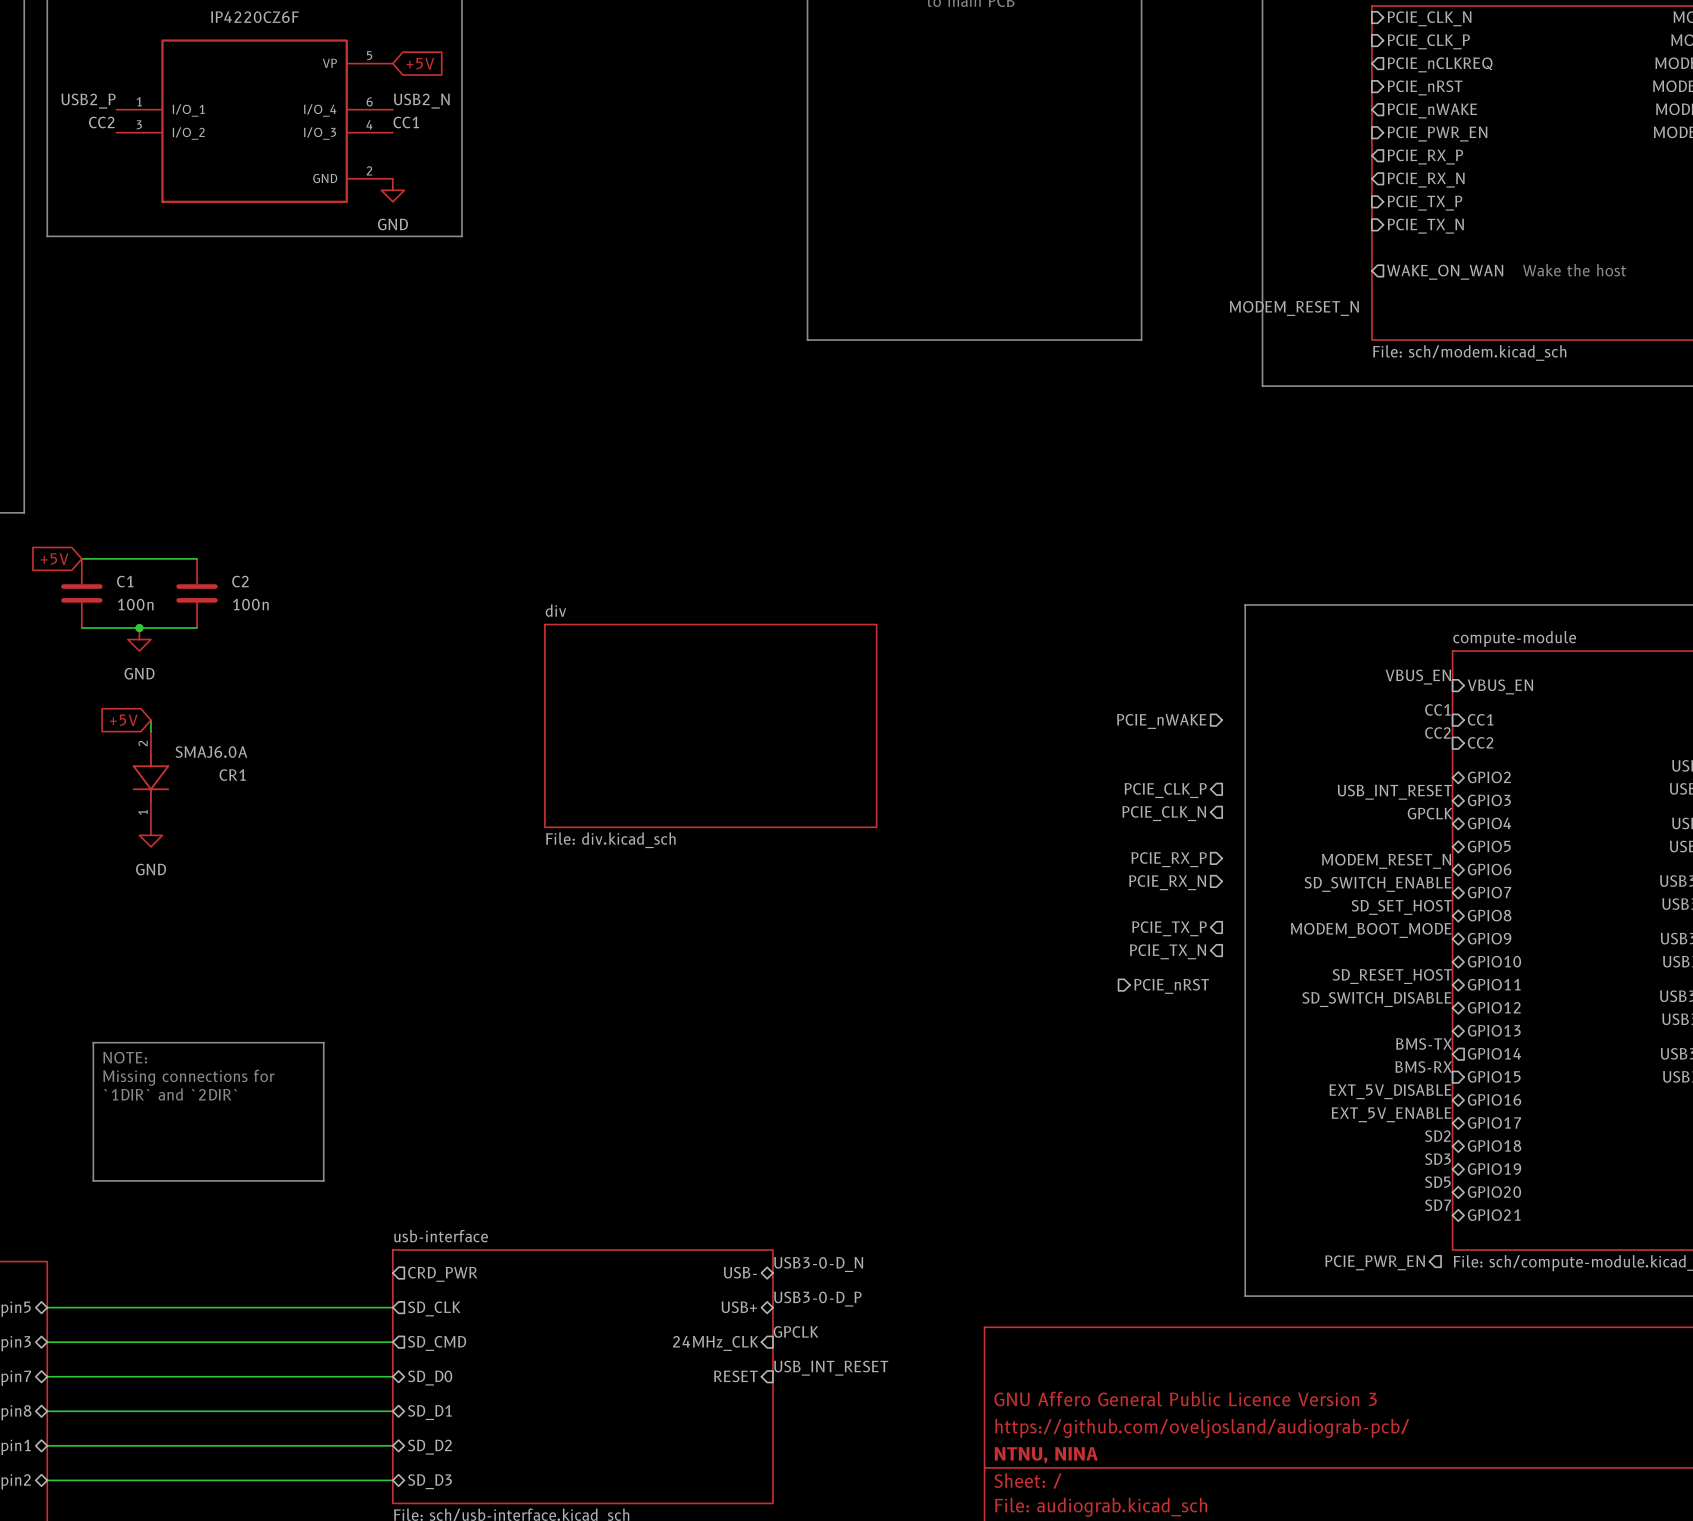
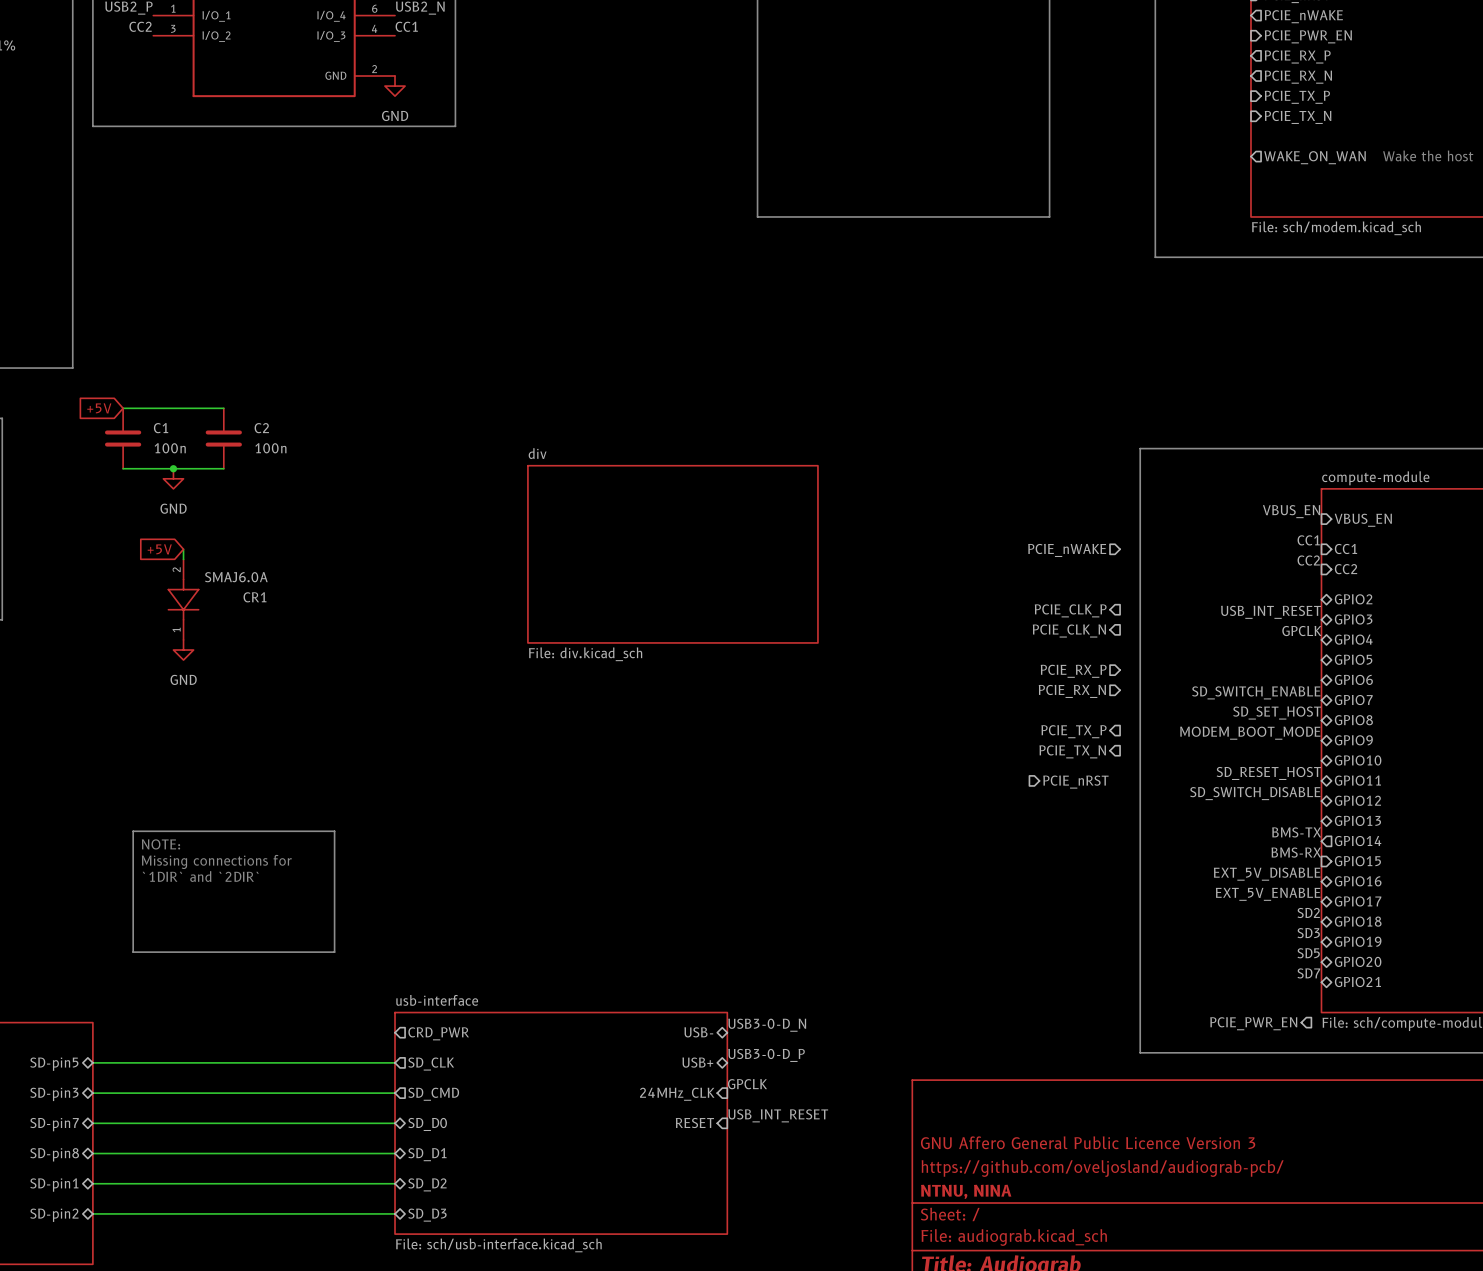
label: MODEM_RESET_N (1294, 308) -> none
label: MODEM_RESET_N (1386, 861) -> none

